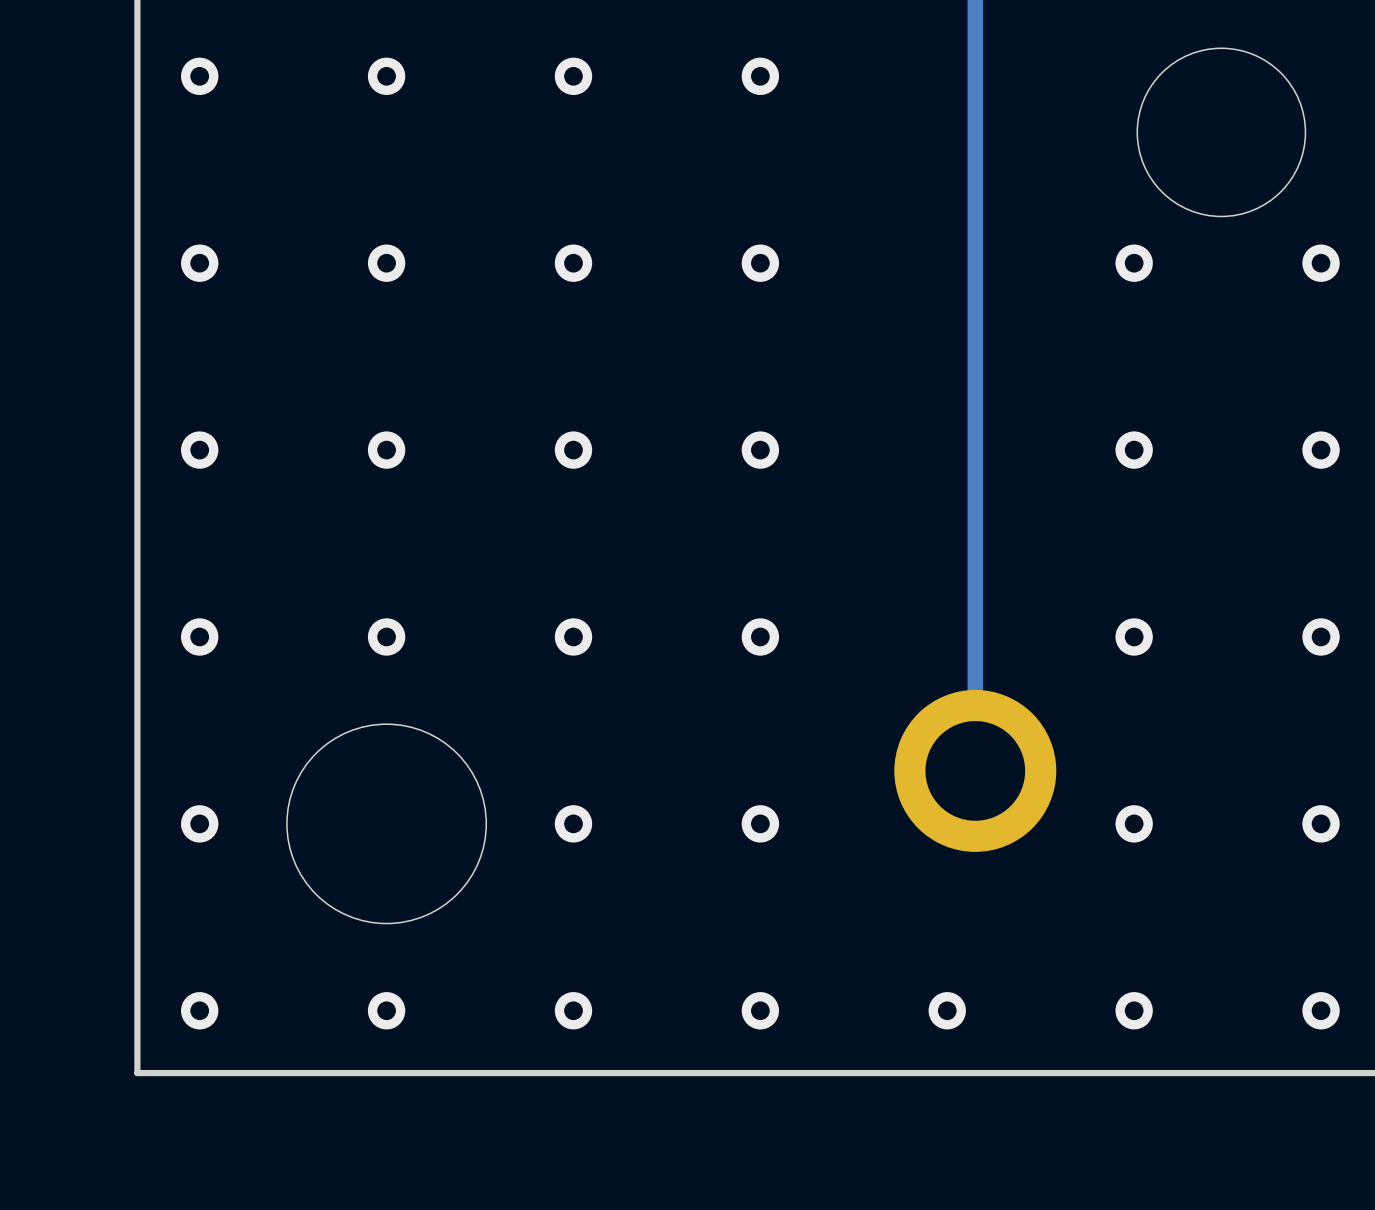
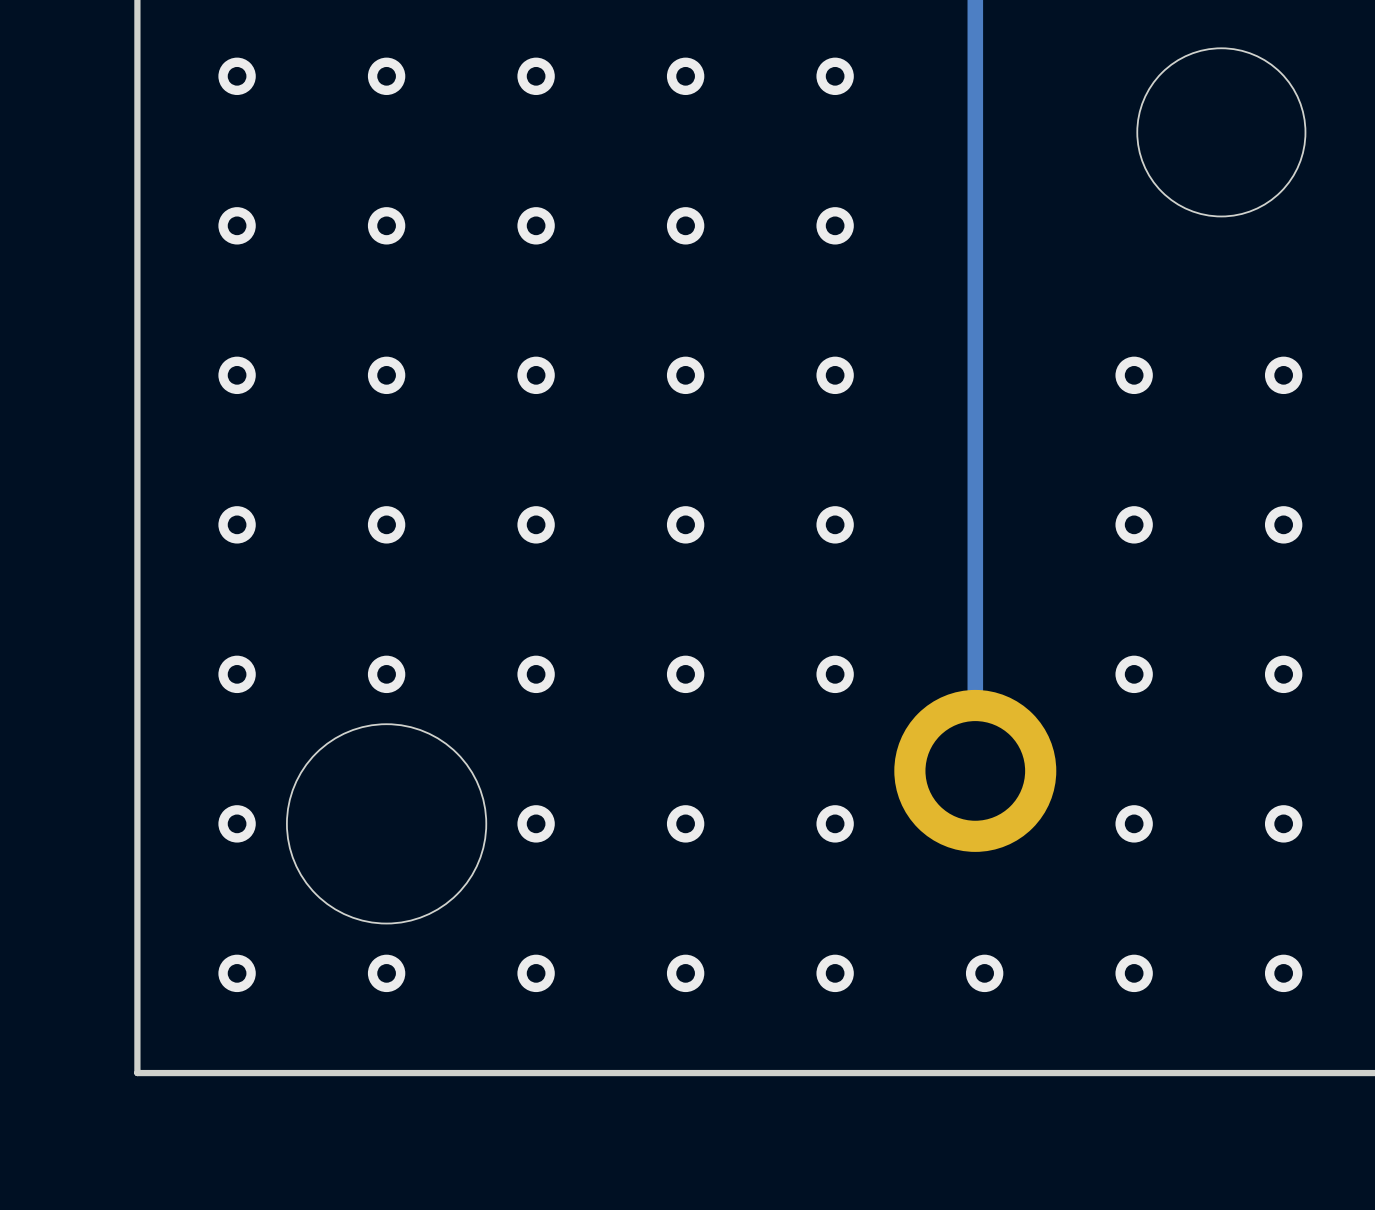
via position: (199, 76) -> (237, 76)
via position: (573, 76) -> (536, 76)
via: none -> (685, 76)
via: (760, 76) -> none
via: none -> (835, 76)
via: none -> (685, 225)
via: none -> (835, 225)
via position: (199, 263) -> (237, 225)
via position: (386, 263) -> (386, 225)
via position: (573, 263) -> (536, 225)
via: (760, 263) -> none
via: (1134, 263) -> none
via: (1321, 263) -> none
via: none -> (237, 375)
via: none -> (386, 375)
via: none -> (536, 375)
via: none -> (685, 375)
via: none -> (835, 375)
via: none -> (1134, 375)
via: none -> (1283, 375)
via: (199, 450) -> none
via: (386, 450) -> none
via: (573, 450) -> none
via: (760, 450) -> none
via: (1134, 450) -> none
via: (1321, 450) -> none
via: none -> (237, 524)
via: none -> (386, 524)
via: none -> (536, 524)
via: none -> (685, 524)
via: none -> (835, 524)
via: none -> (1134, 524)
via: none -> (1283, 524)
via position: (199, 636) -> (237, 674)
via position: (386, 636) -> (386, 674)
via position: (573, 636) -> (536, 674)
via: (760, 636) -> none
via position: (1134, 636) -> (1134, 674)
via position: (1321, 636) -> (1283, 674)
via: none -> (685, 674)
via: none -> (835, 674)
via position: (199, 823) -> (237, 823)
via position: (573, 823) -> (536, 823)
via: none -> (685, 823)
via: (760, 823) -> none
via: none -> (835, 823)
via position: (1321, 823) -> (1283, 823)
via: none -> (685, 973)
via: none -> (835, 973)
via position: (199, 1010) -> (237, 973)
via position: (386, 1010) -> (386, 973)
via position: (573, 1010) -> (536, 973)
via: (760, 1010) -> none
via position: (947, 1010) -> (984, 973)
via position: (1134, 1010) -> (1134, 973)
via position: (1321, 1010) -> (1283, 973)

